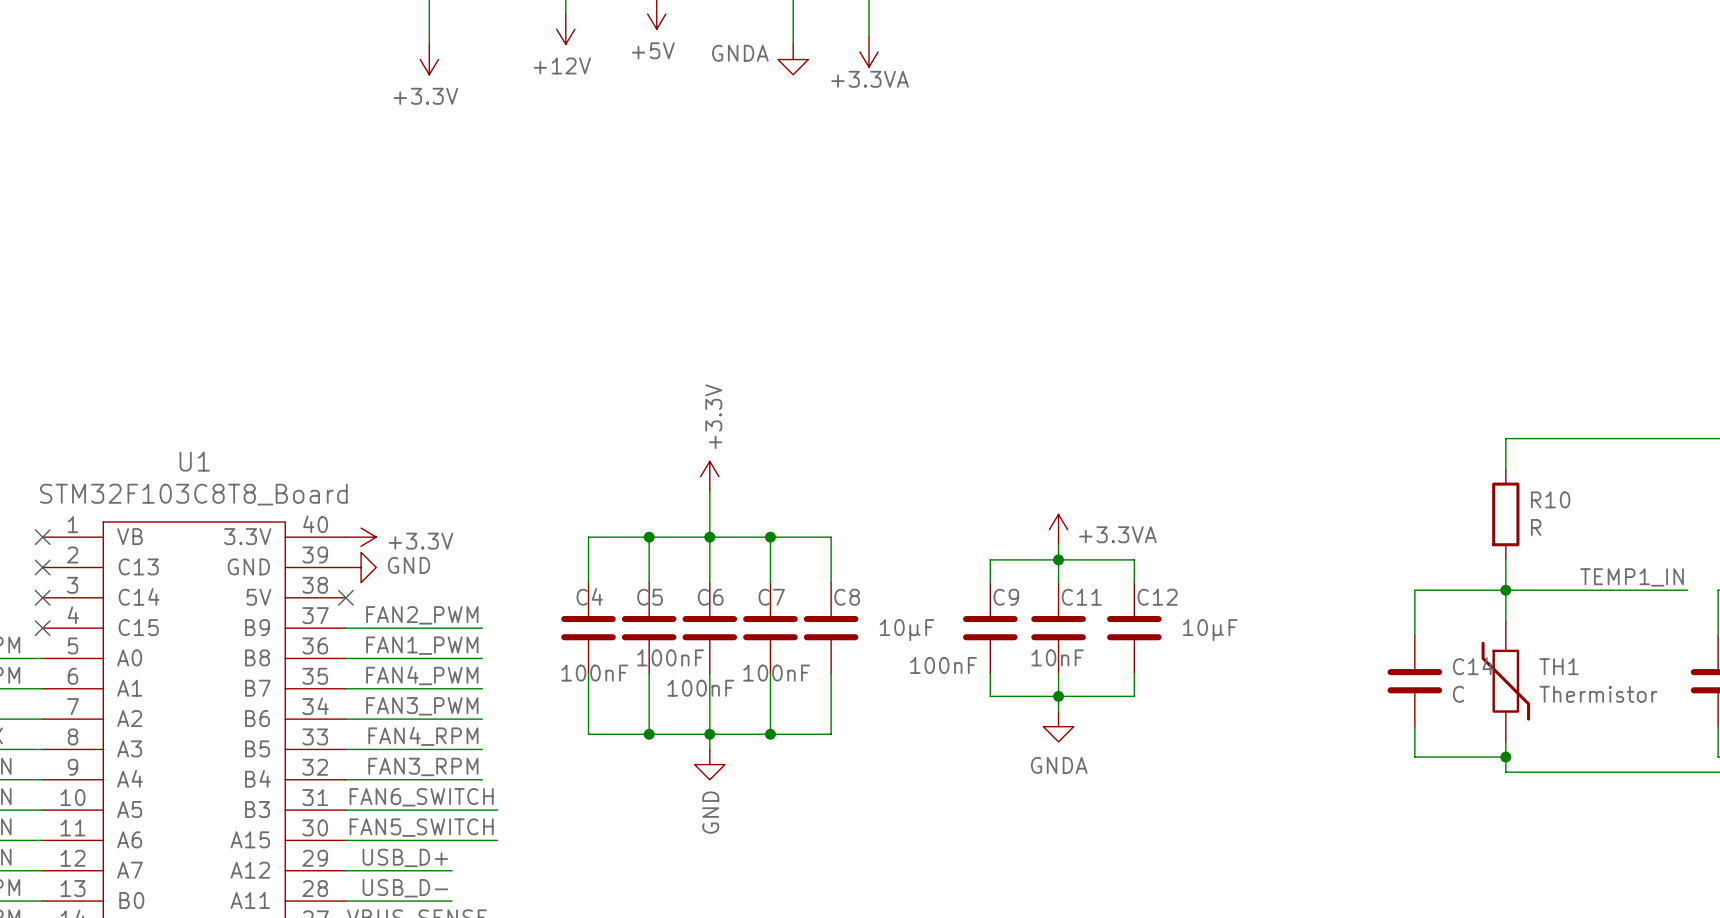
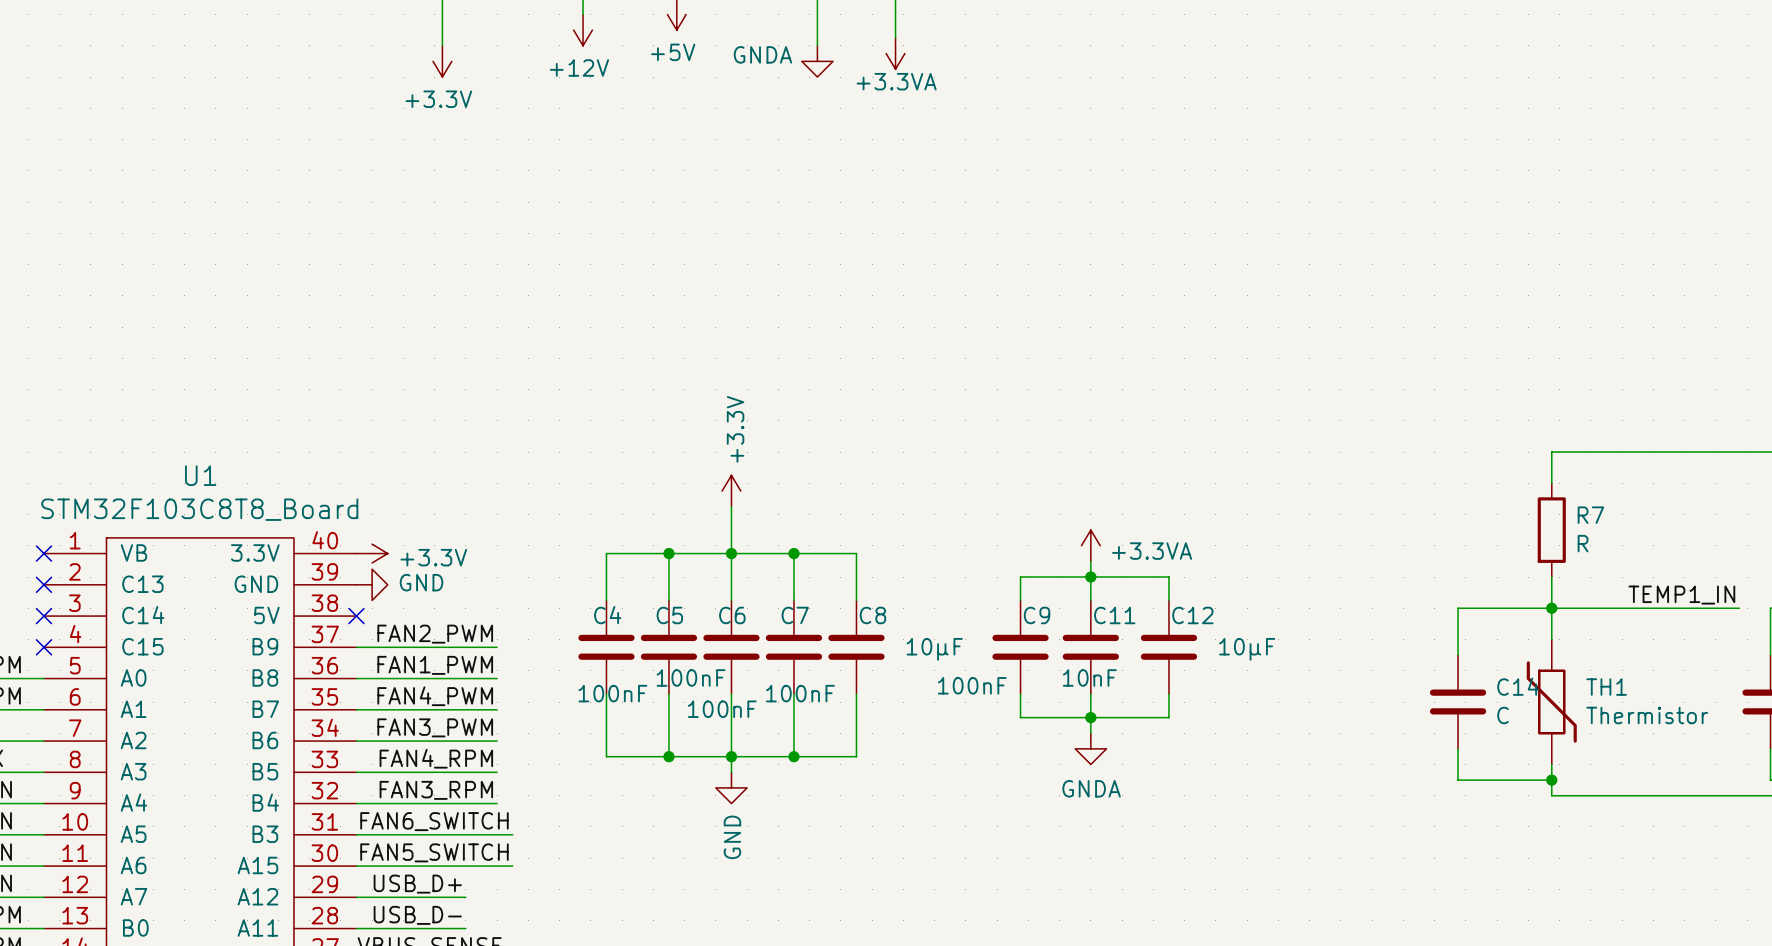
R10 name: R10 (1550, 499) -> R7 (1590, 515)

